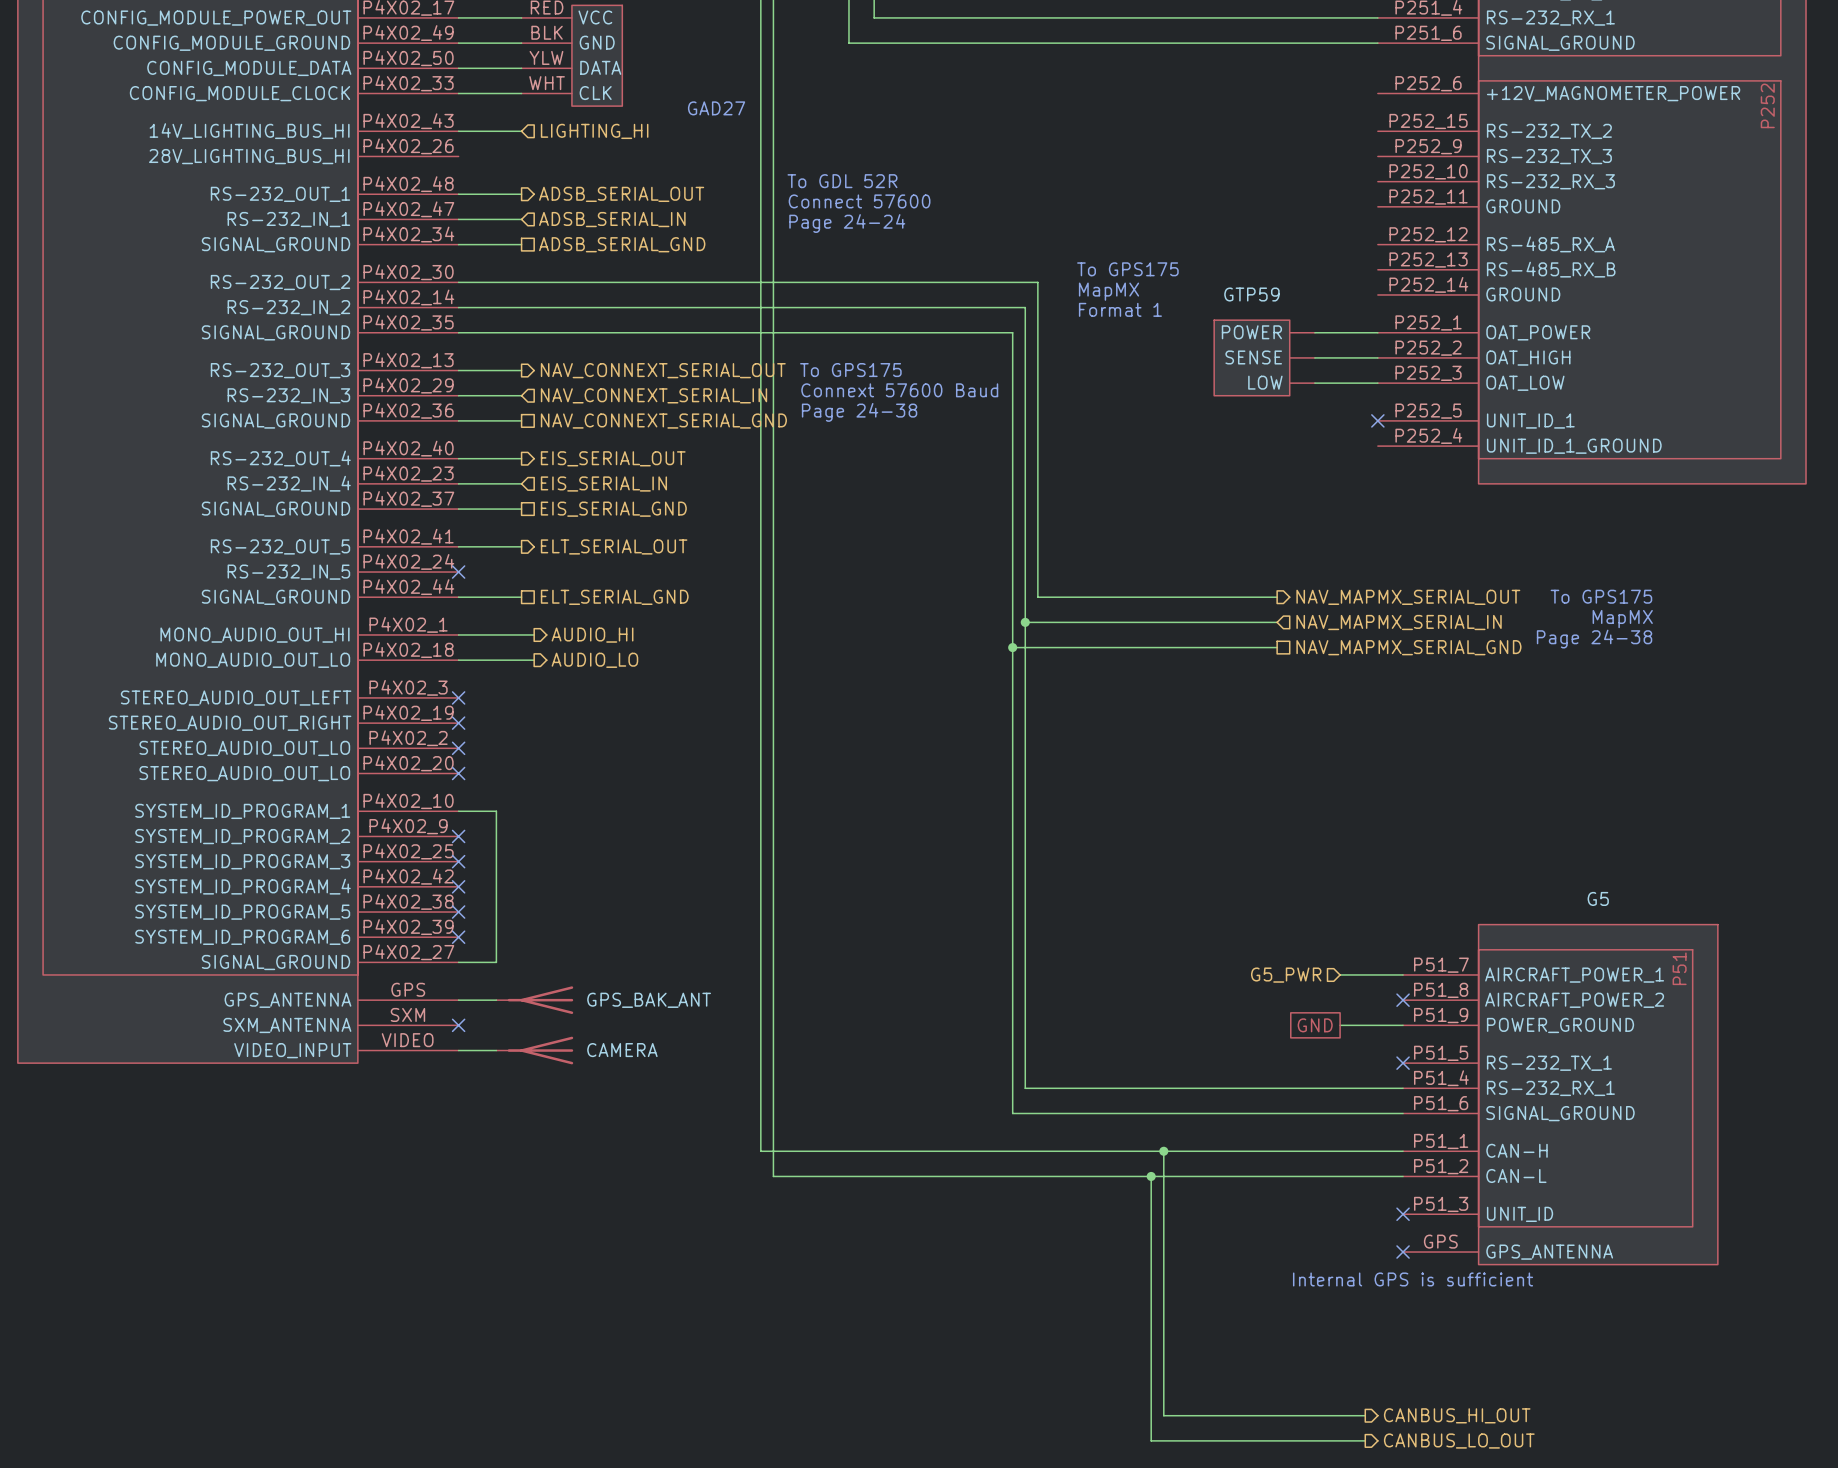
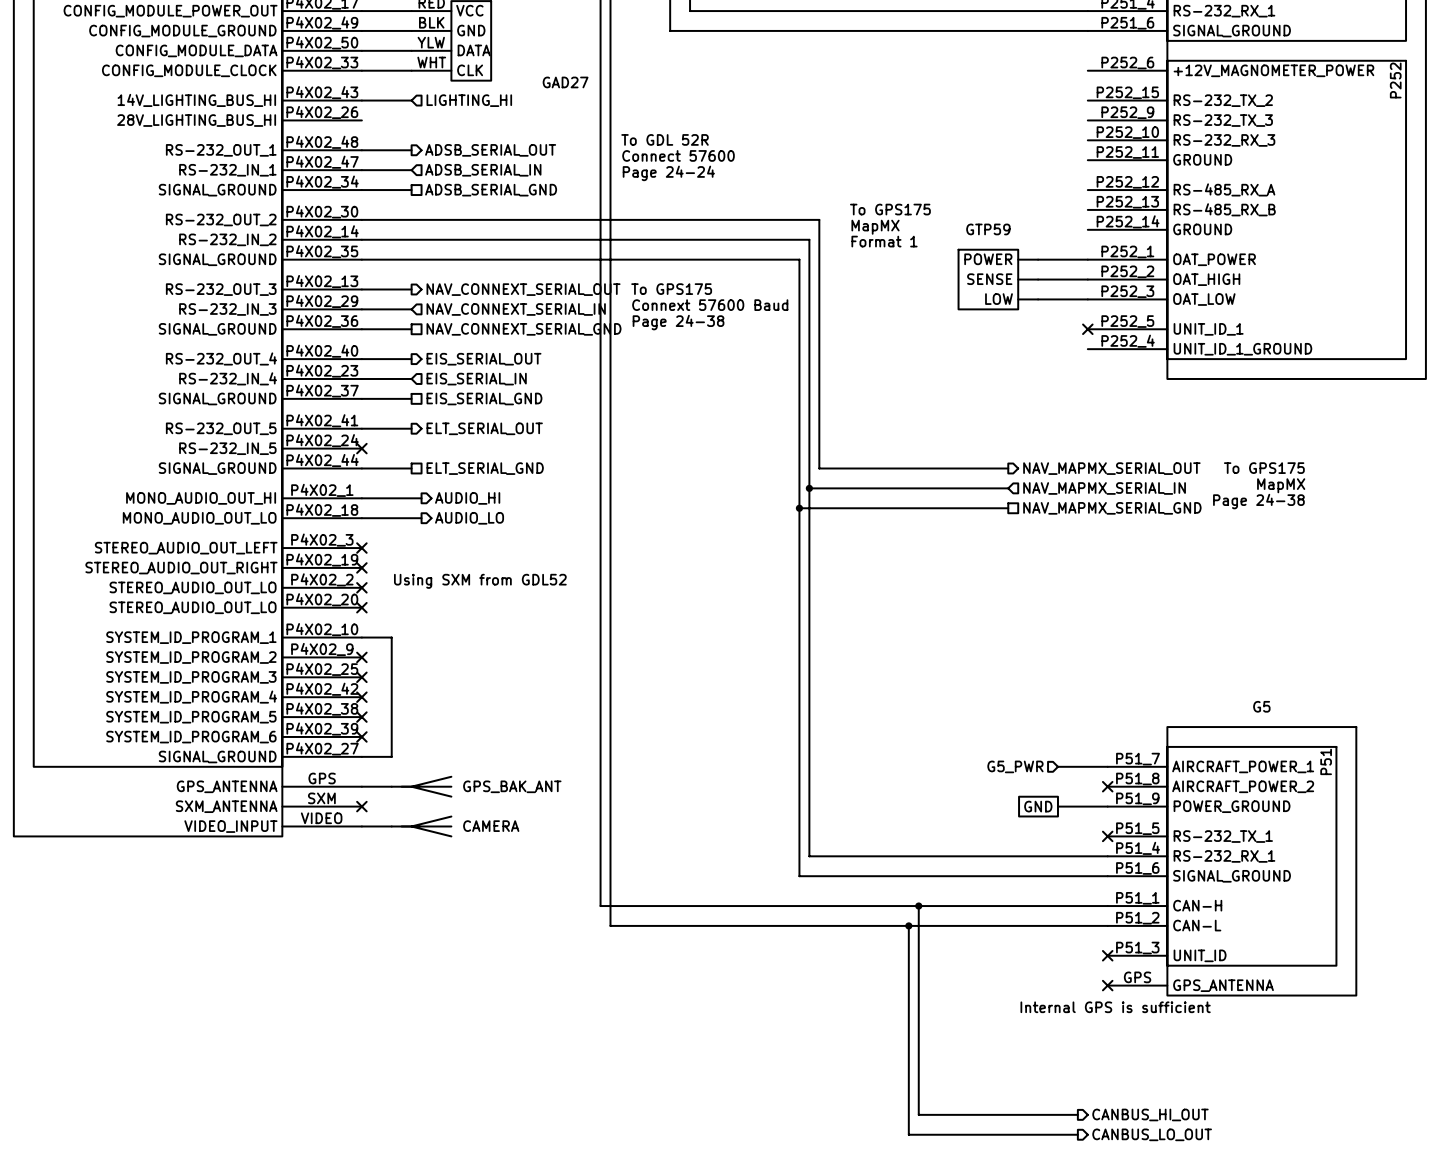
text: none -> Using SXM from GDL52 (480, 581)

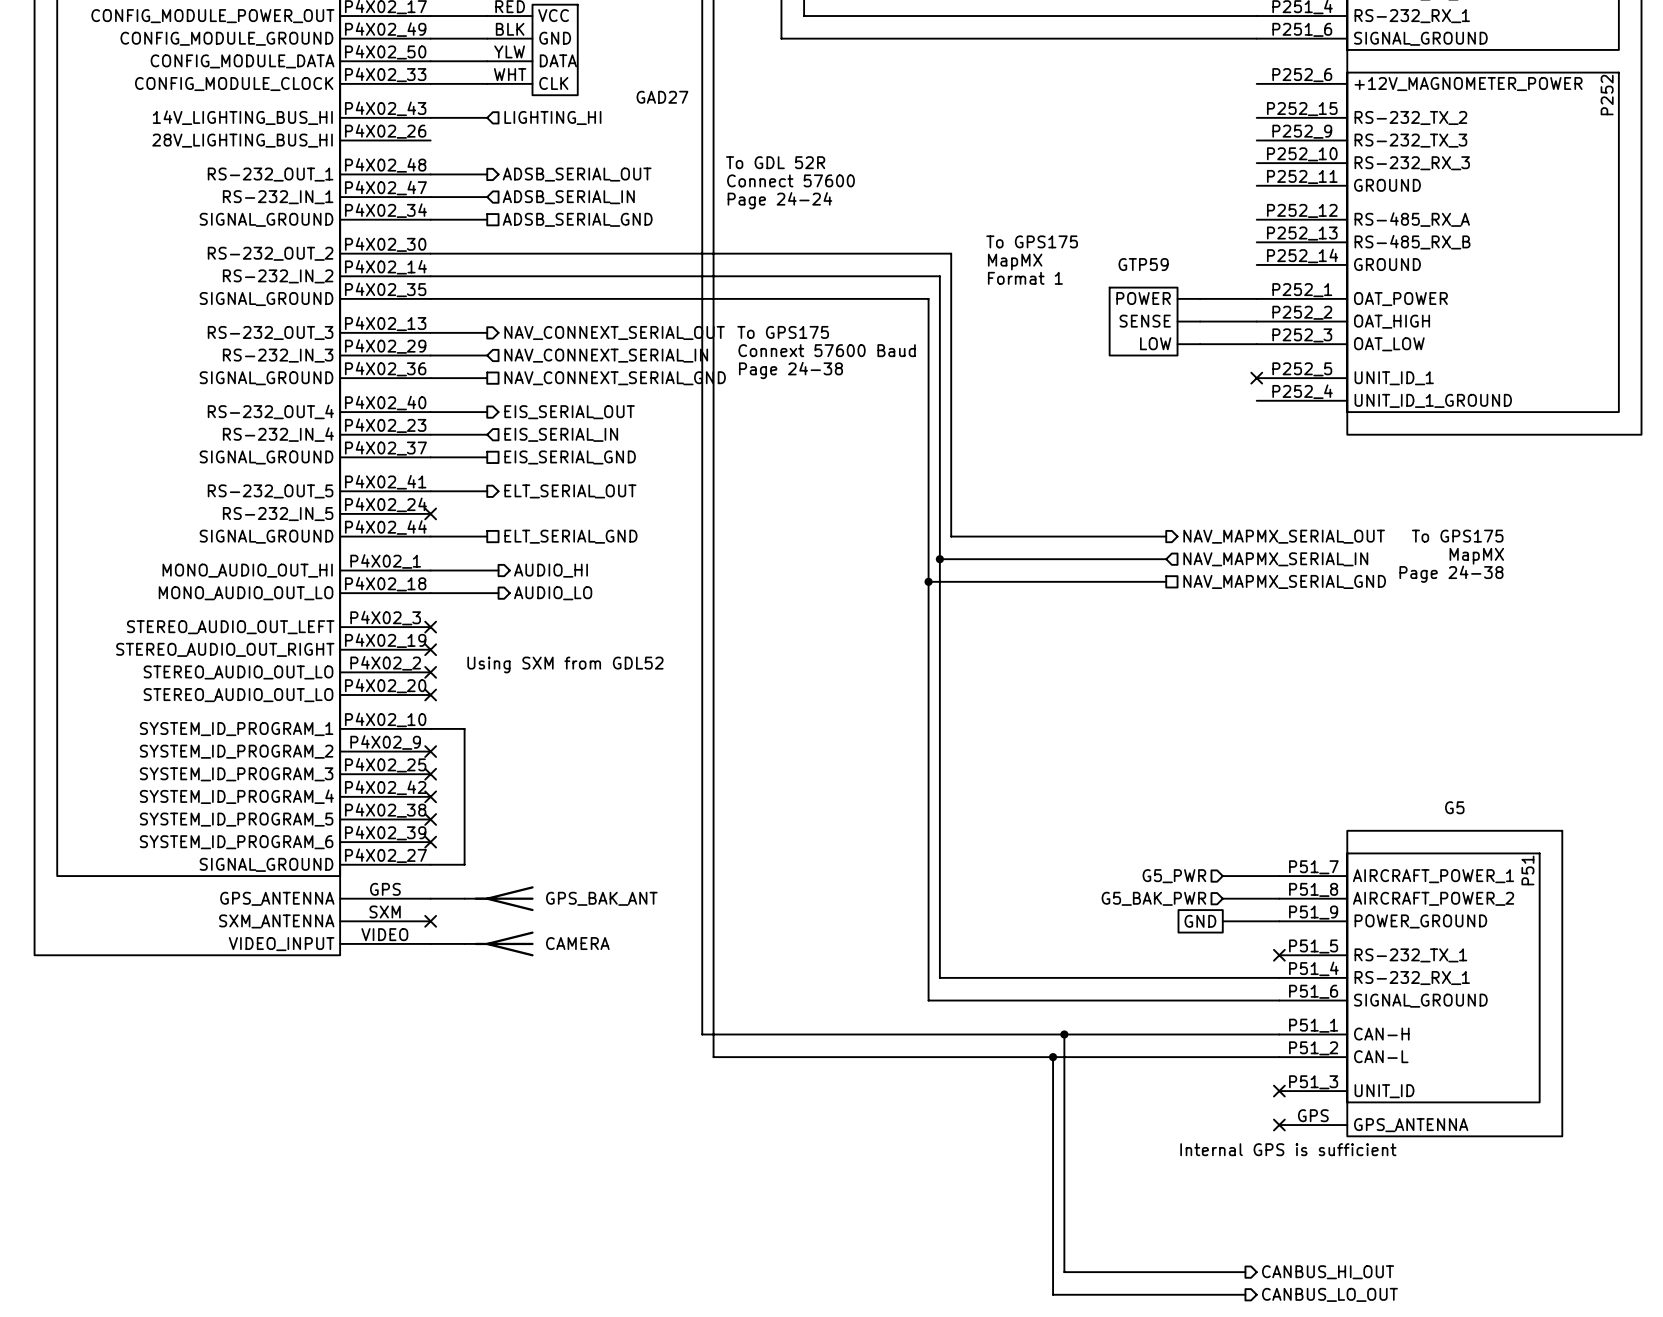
hierarchical label: none -> G5_BAK_PWR (1153, 898)
wire: none -> (1222, 898) (1279, 898)
no-connect mark: (1107, 786) -> none

